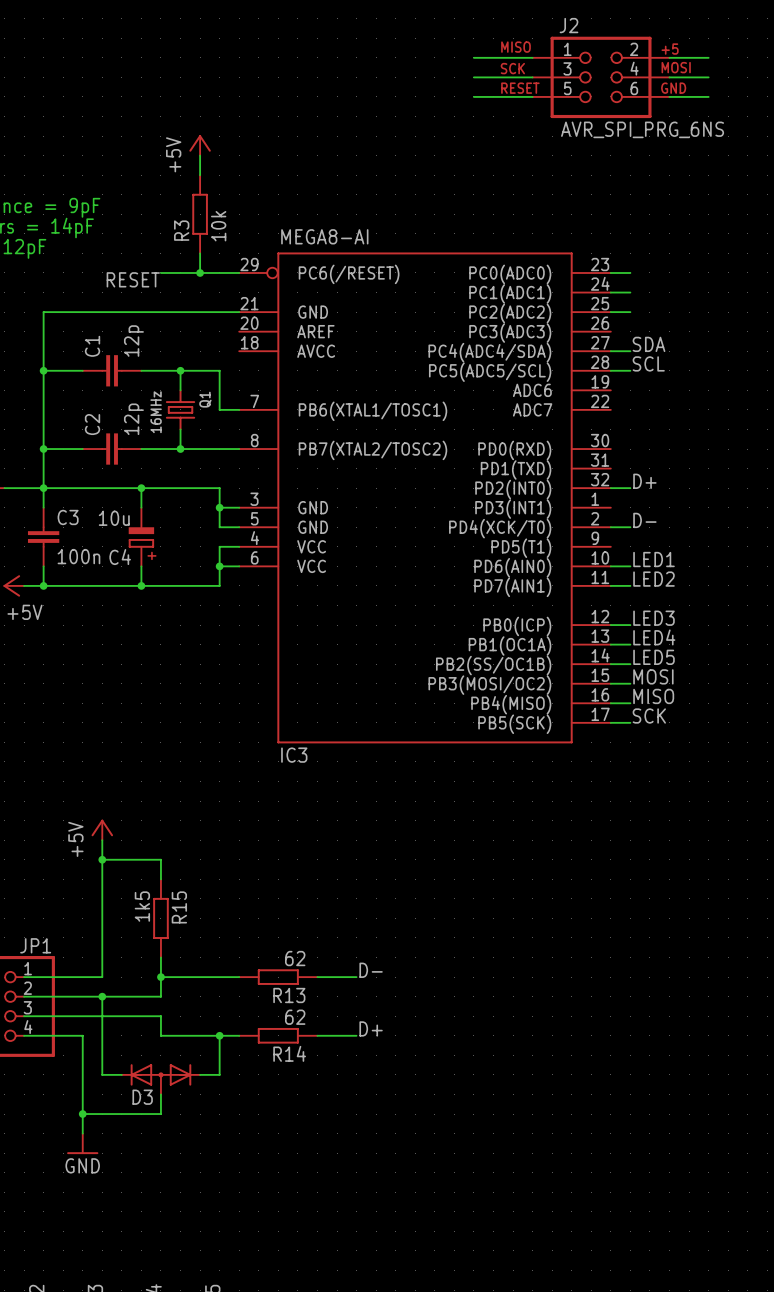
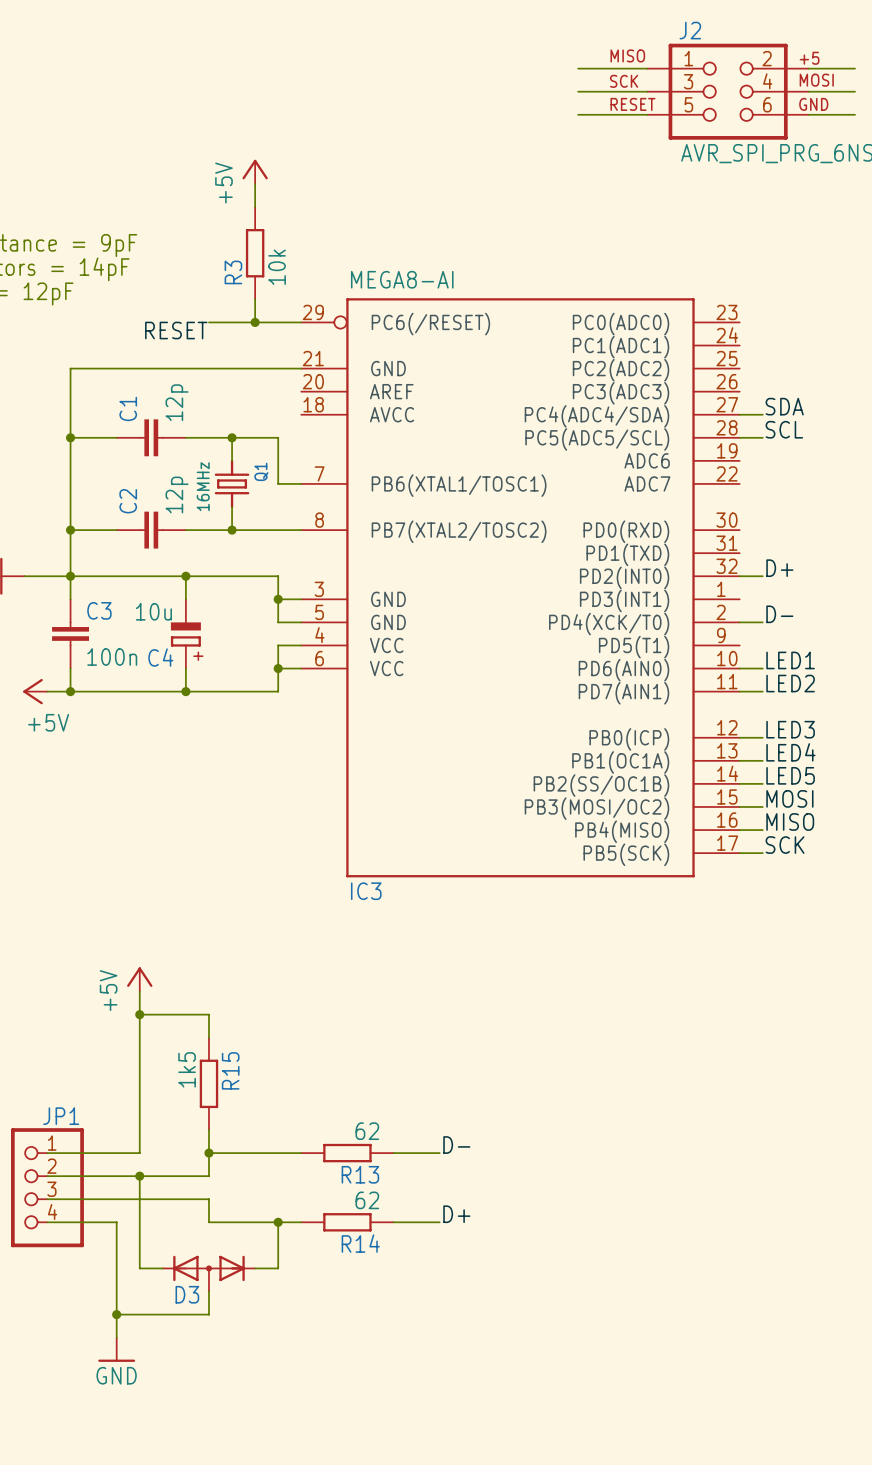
wire: (610, 272) (630, 272) -> none
wire: (610, 292) (630, 292) -> none
wire: (610, 312) (630, 312) -> none

